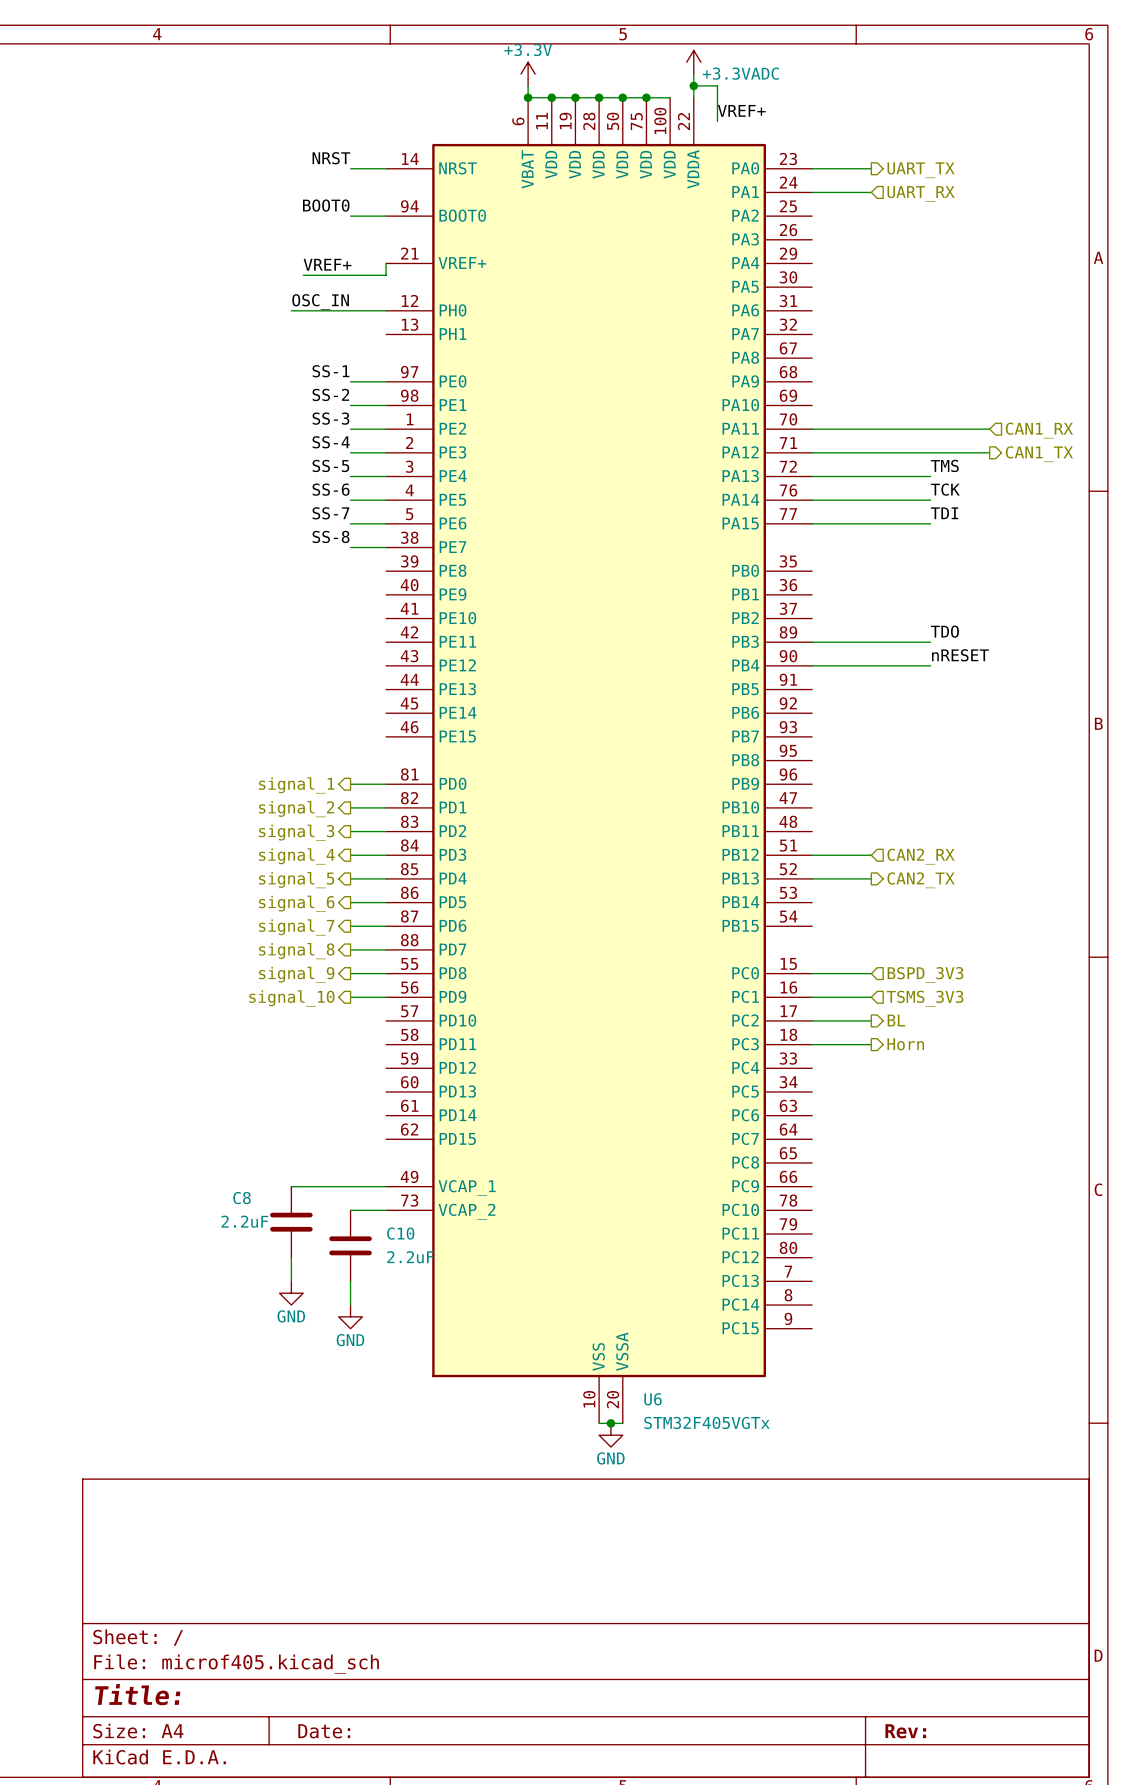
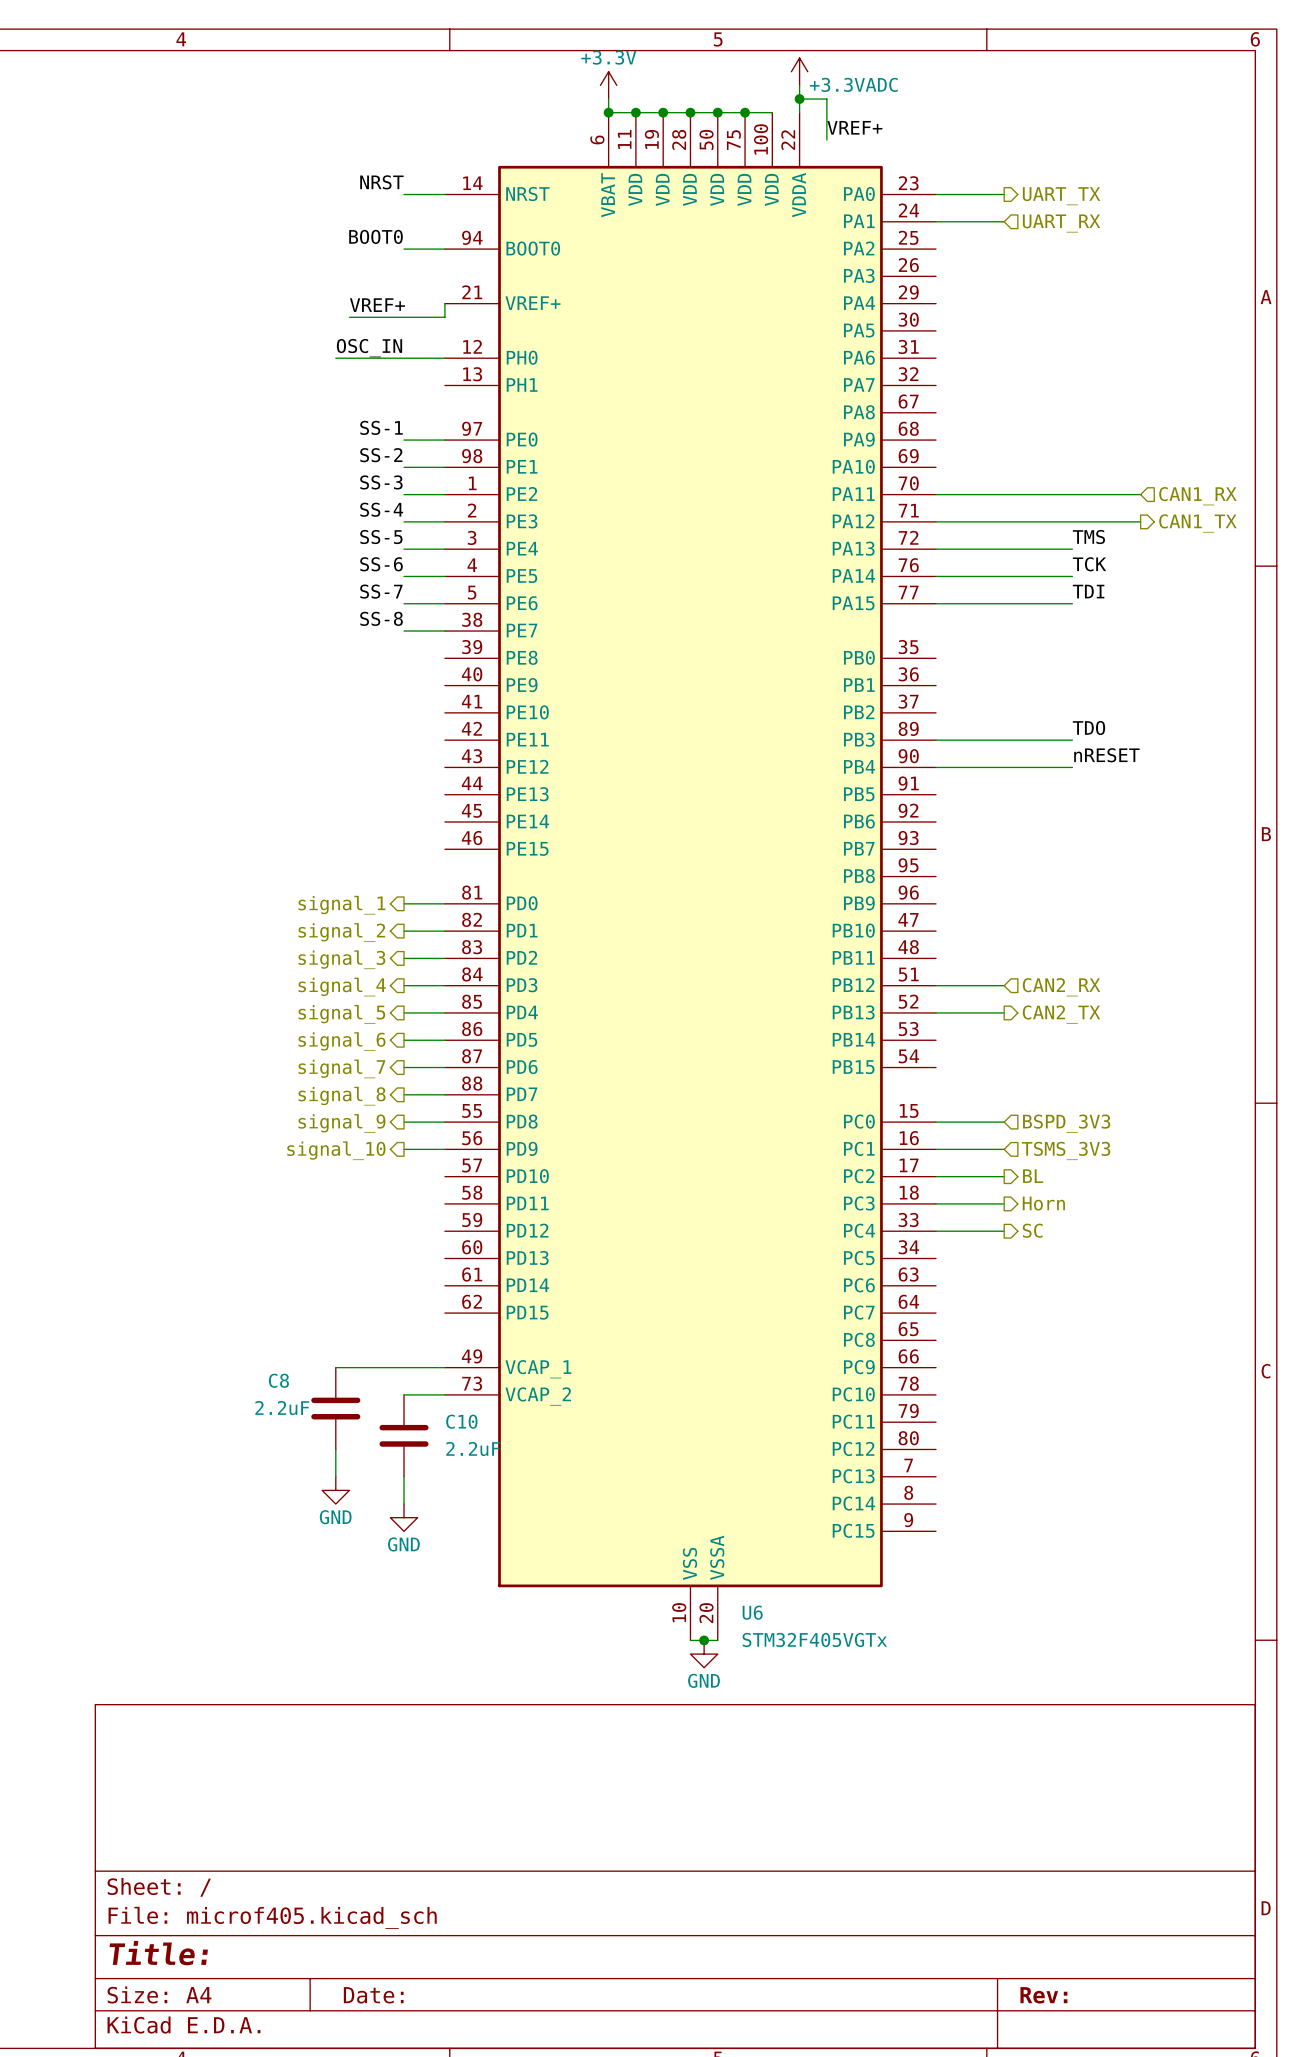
hierarchical label: none -> SC (1032, 1230)
wire: none -> (936, 1231) (1004, 1231)

